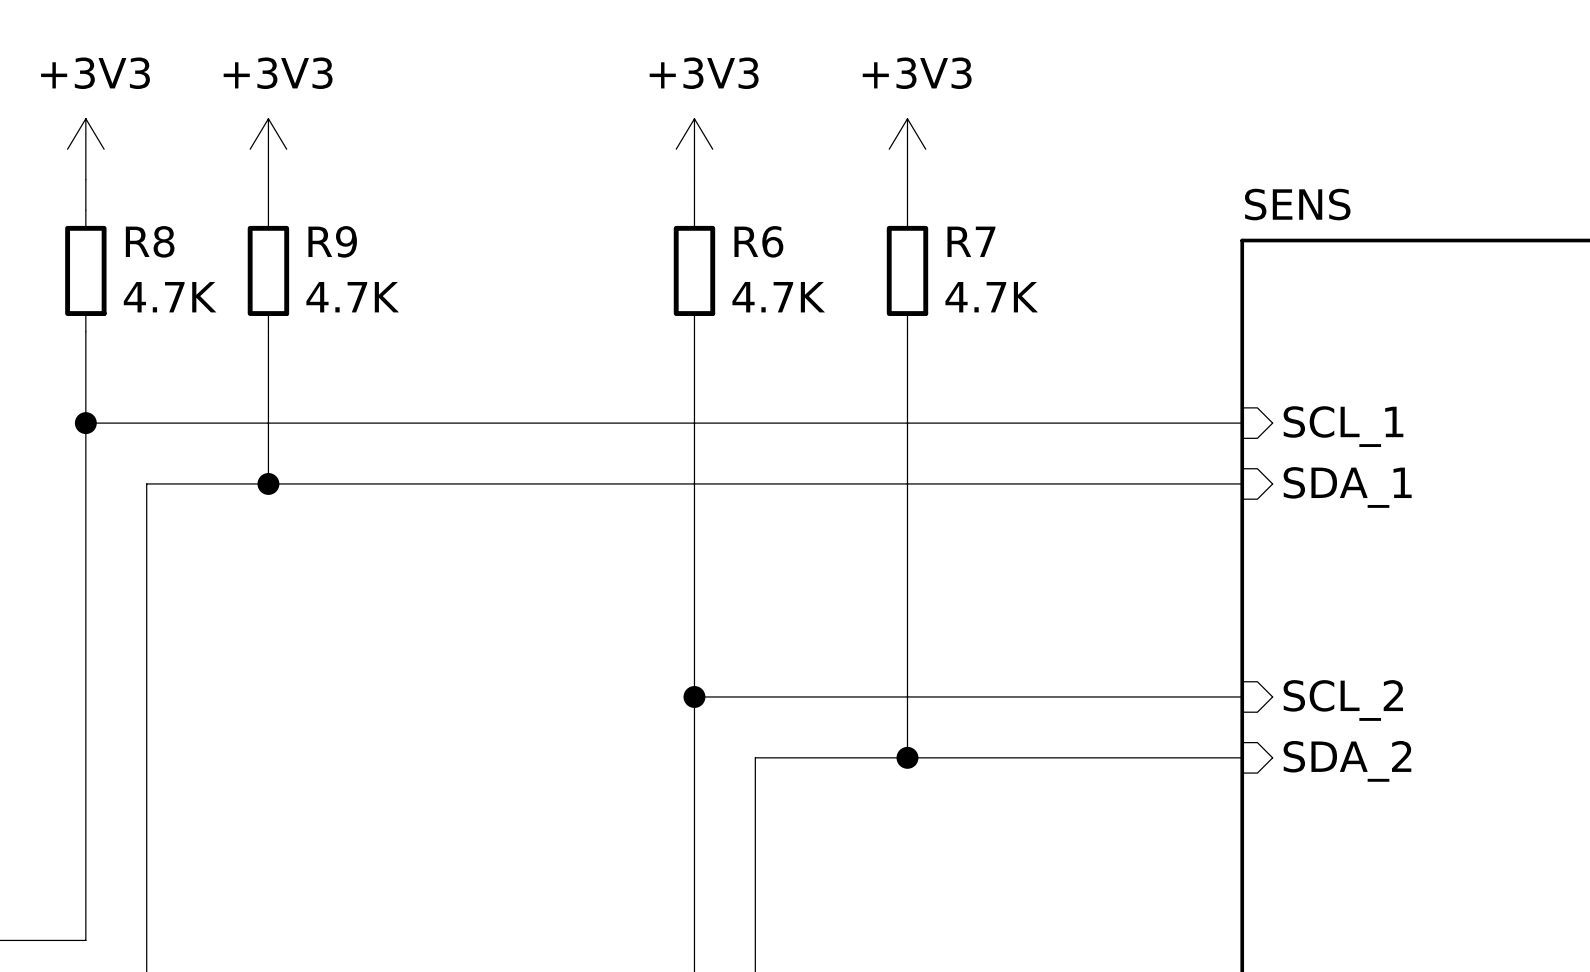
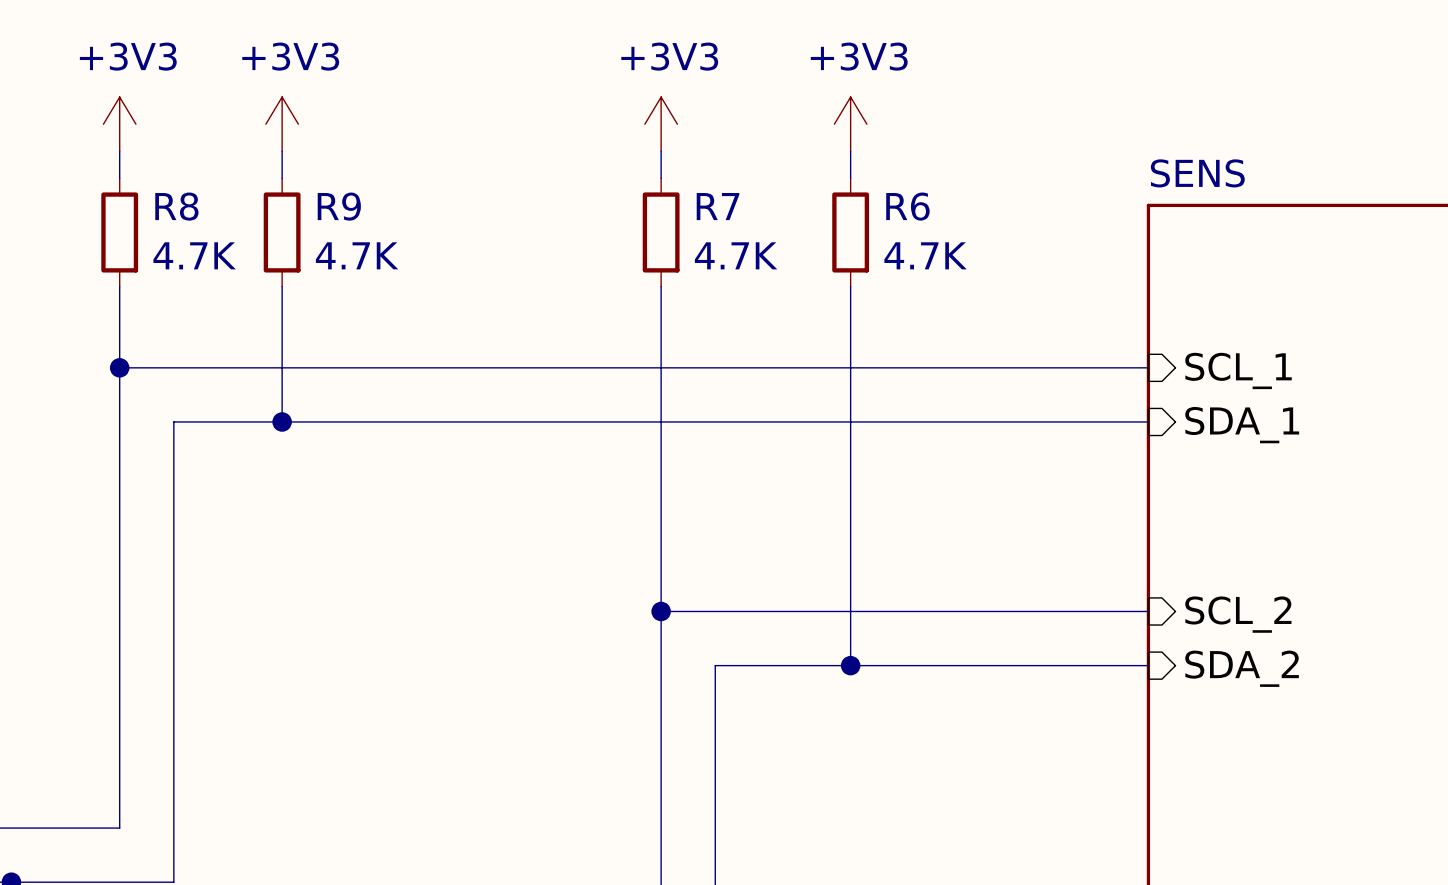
R6 name: R6 (758, 241) -> R7 (718, 206)
R7 name: R7 (971, 241) -> R6 (907, 206)

